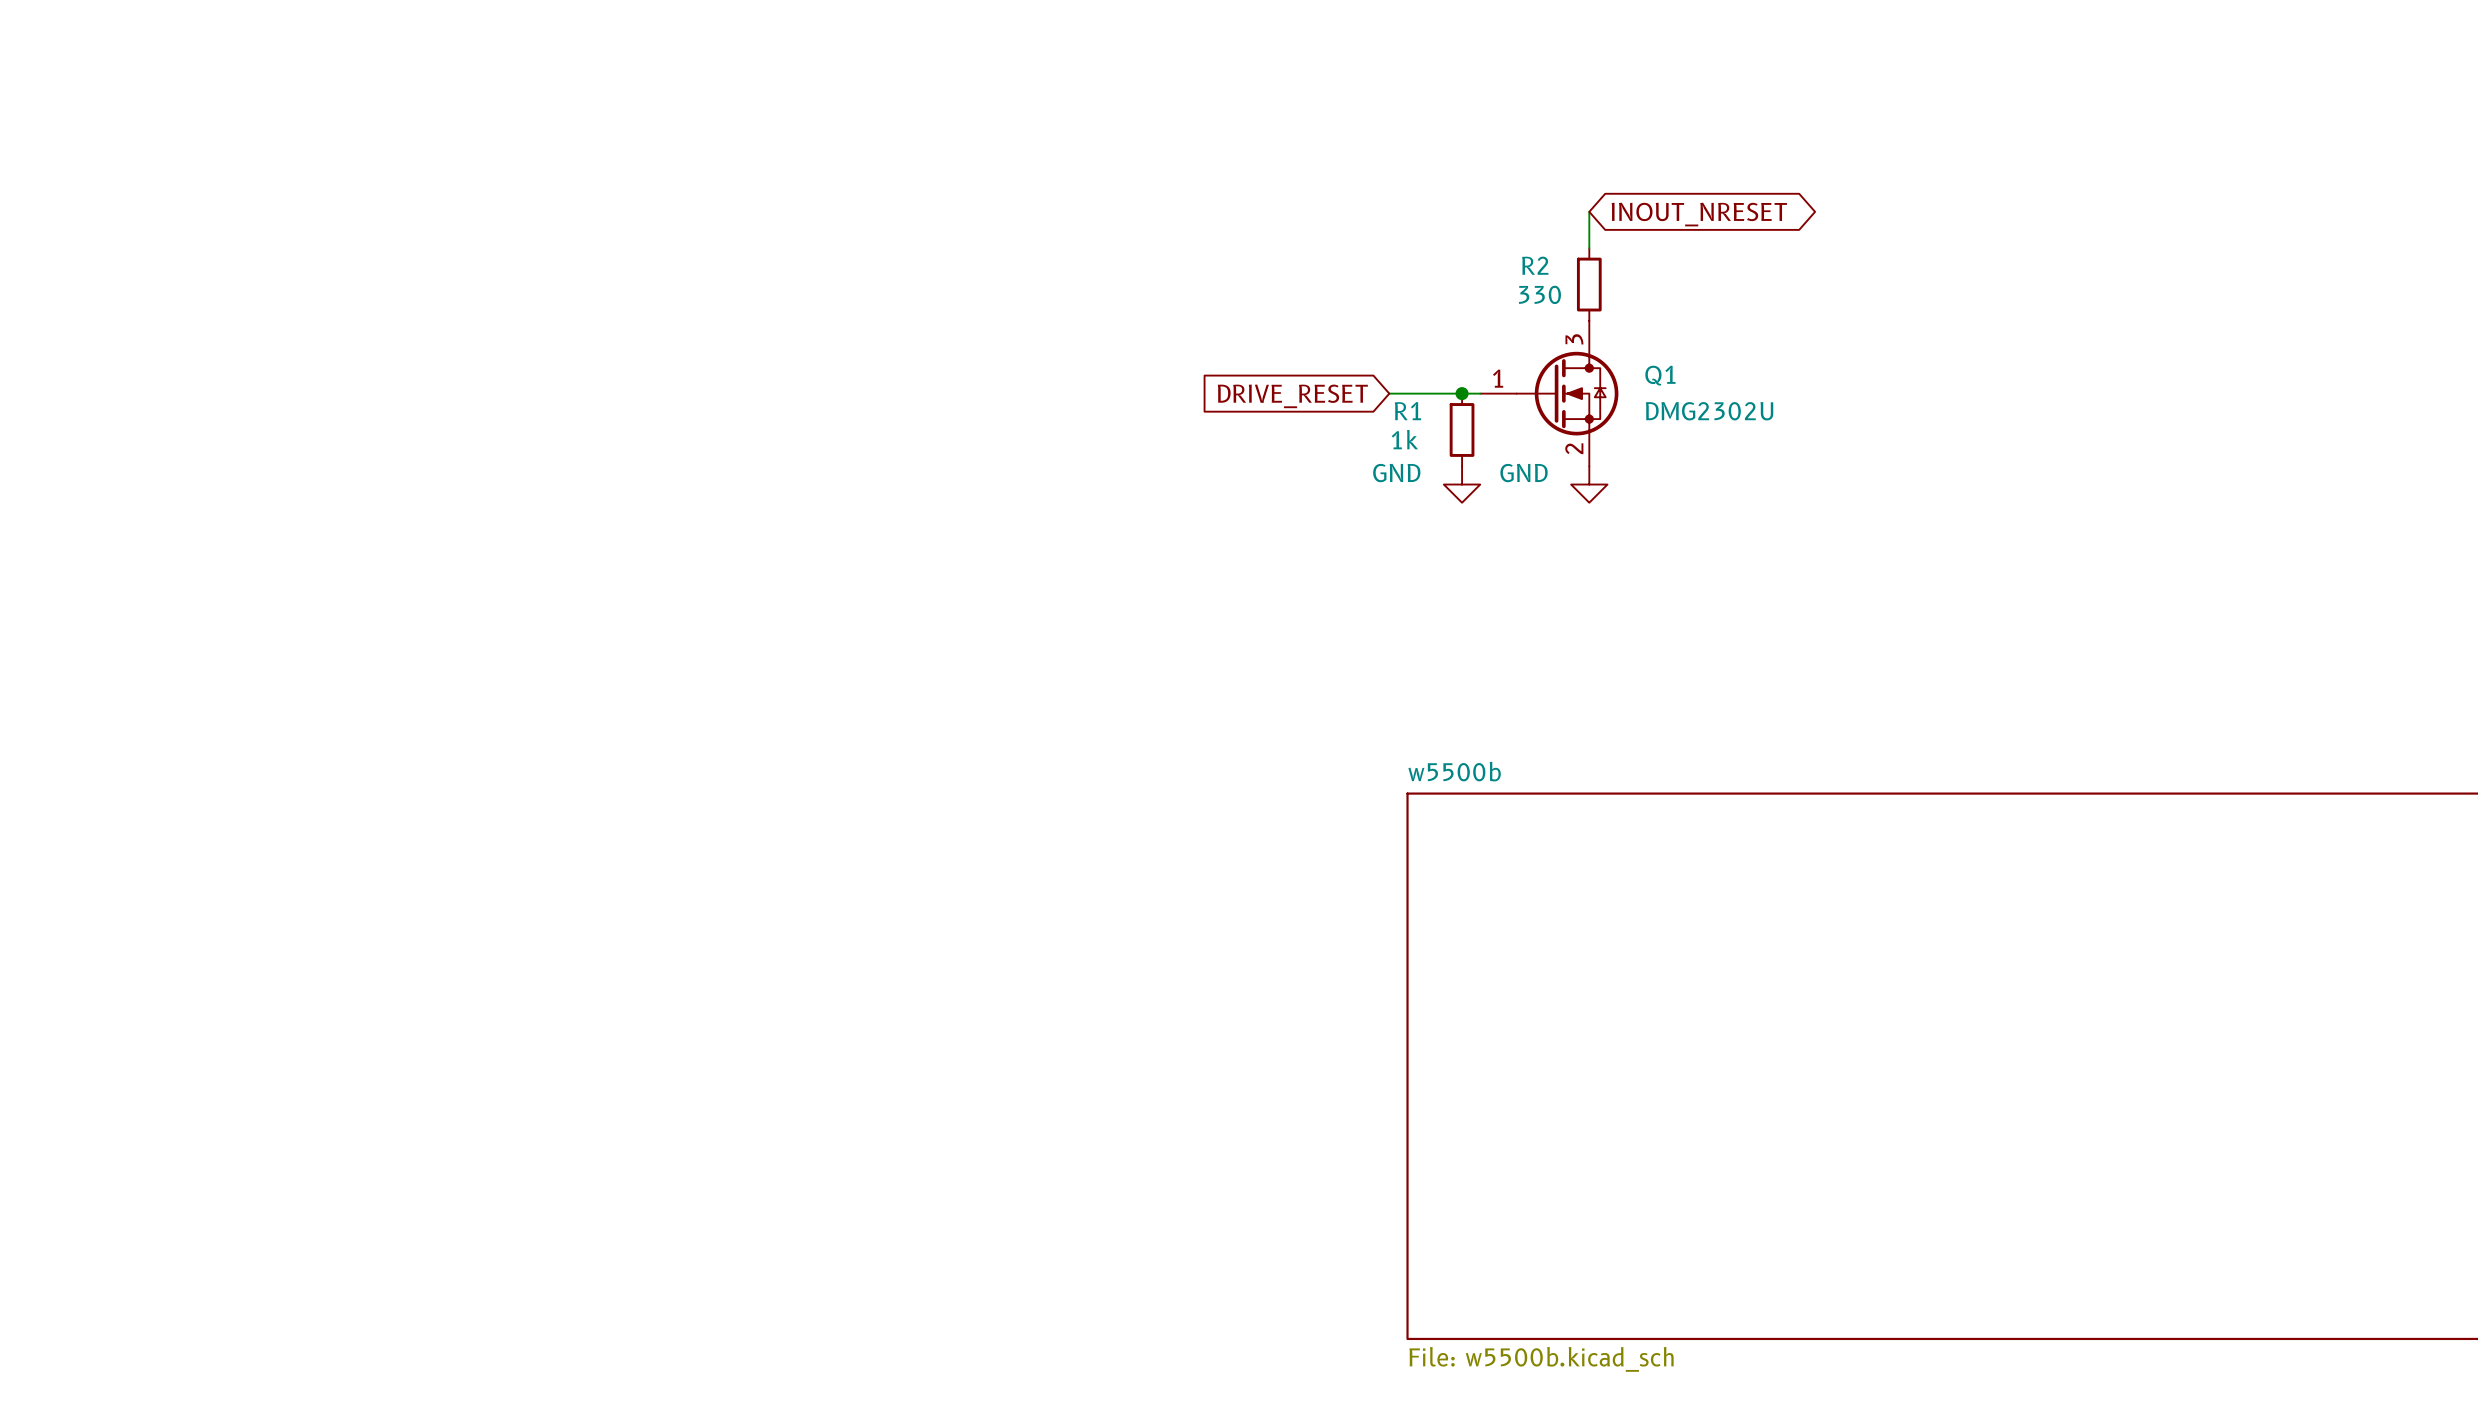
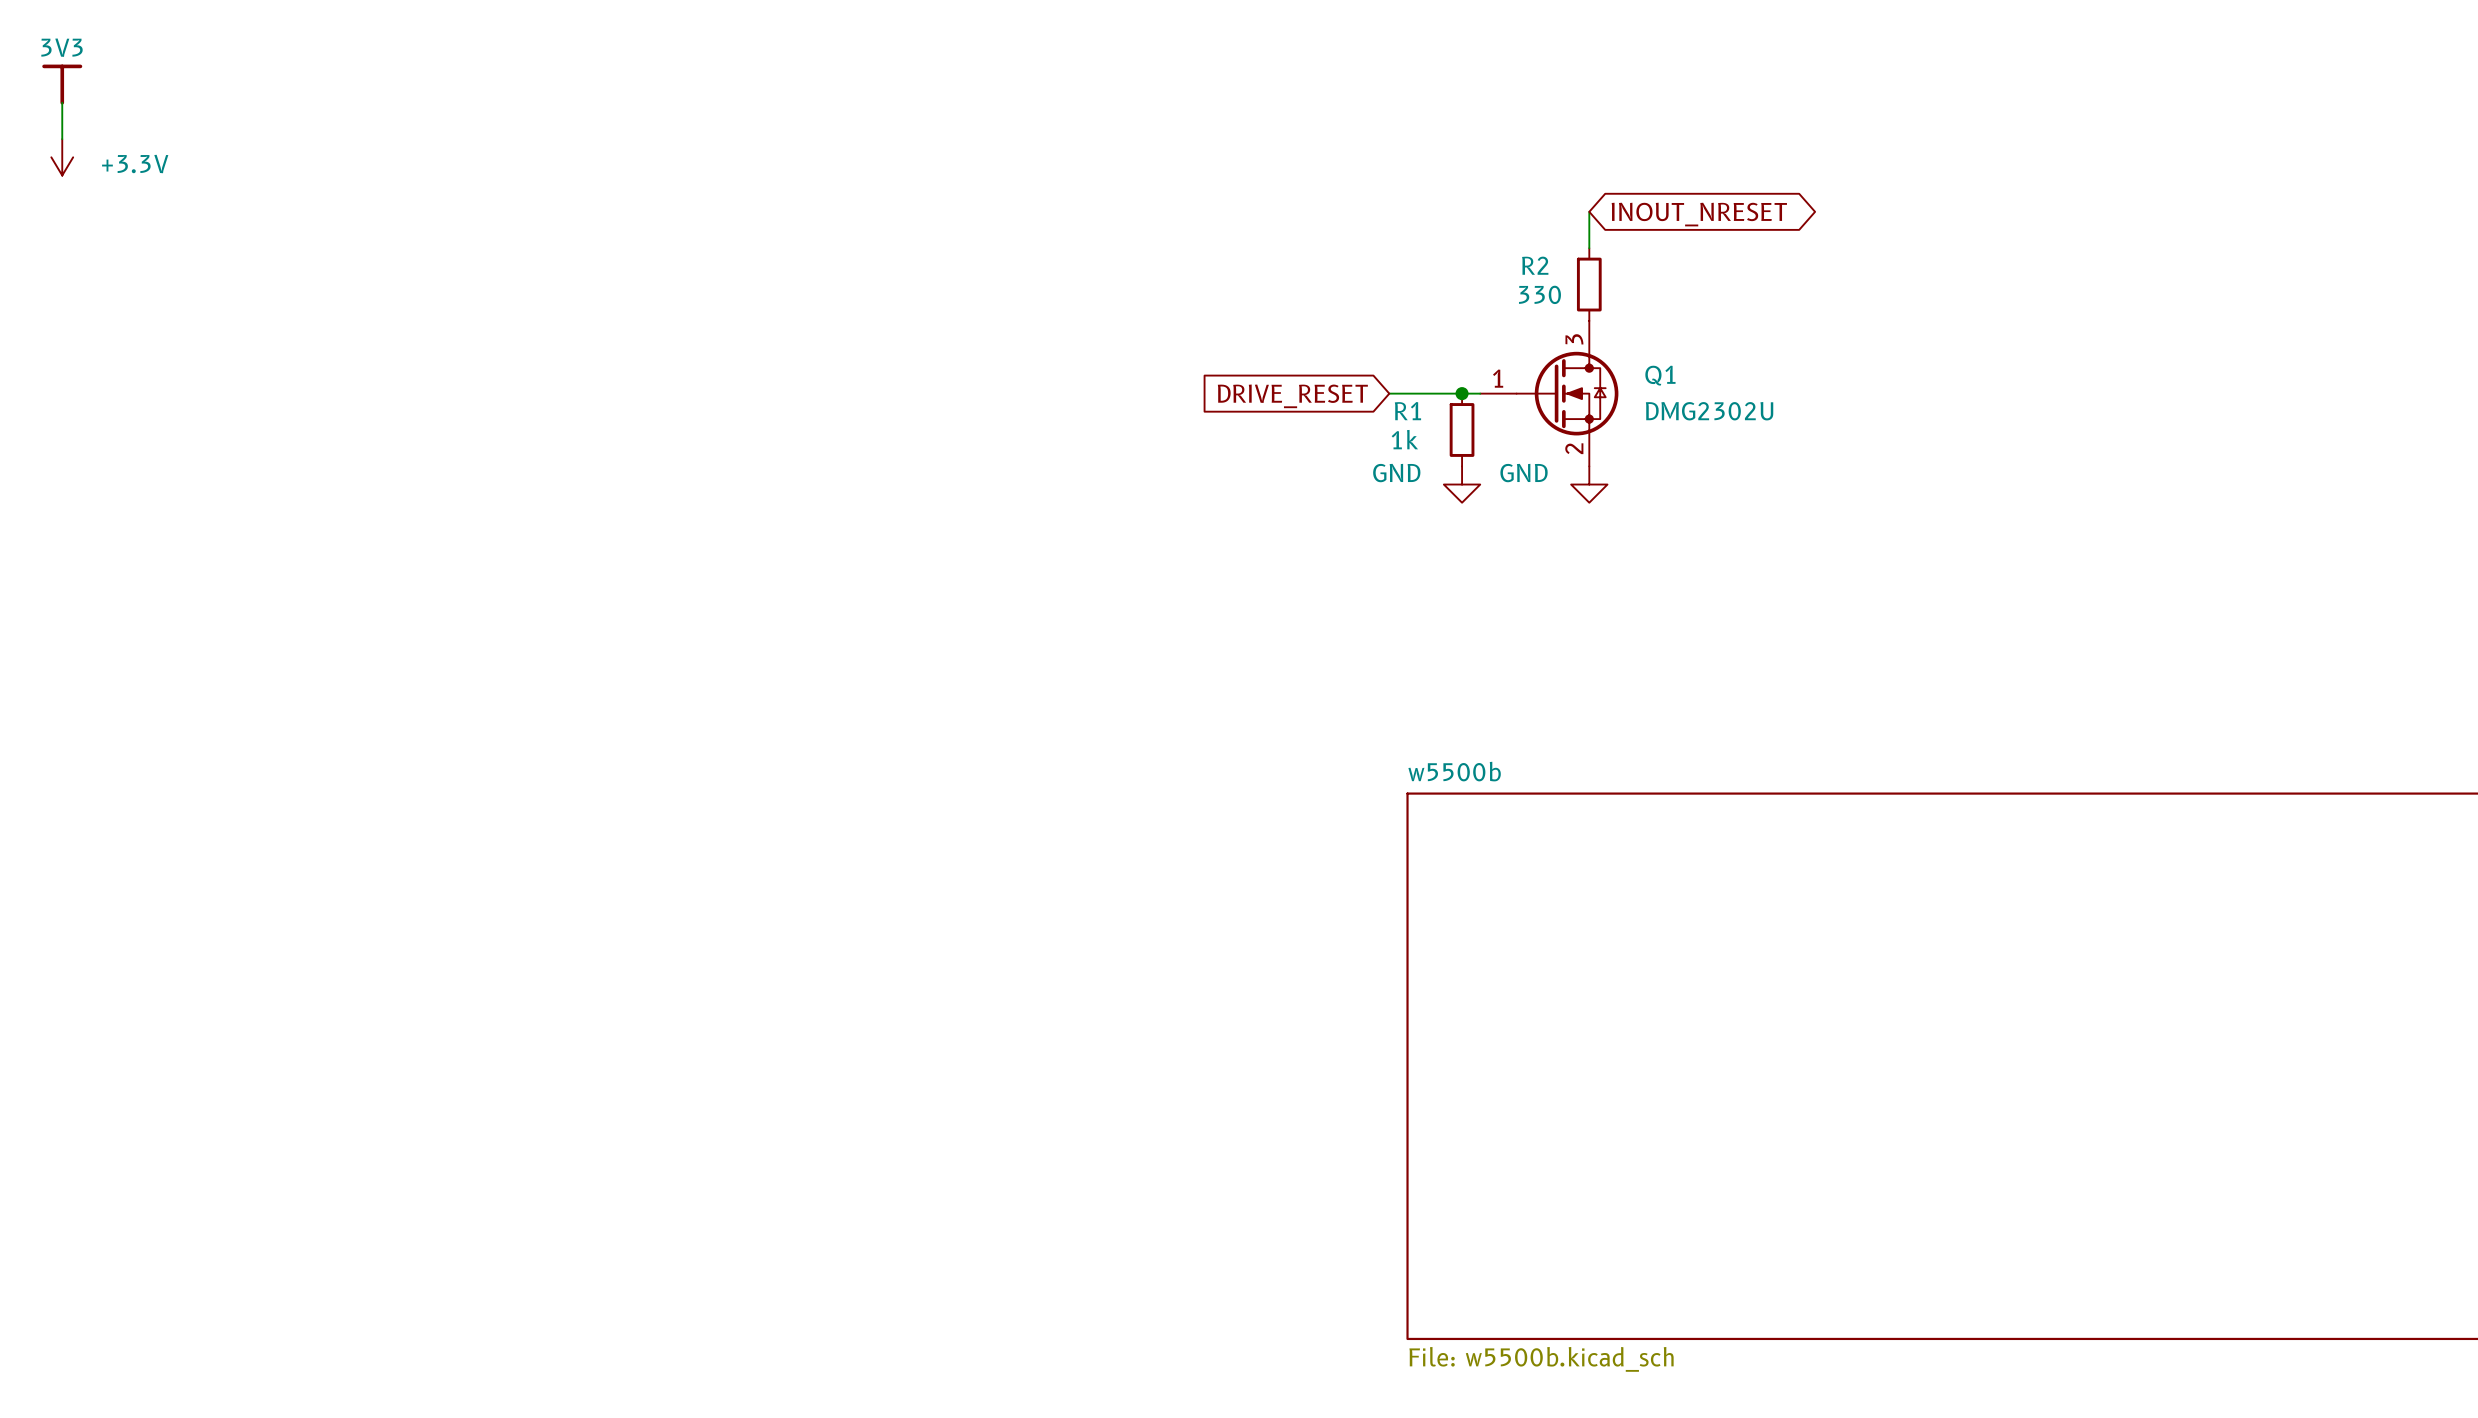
power symbol: none -> 3V3 (62, 84)
wire: none -> (62, 102) (62, 139)
power symbol: none -> +3.3V (62, 157)

